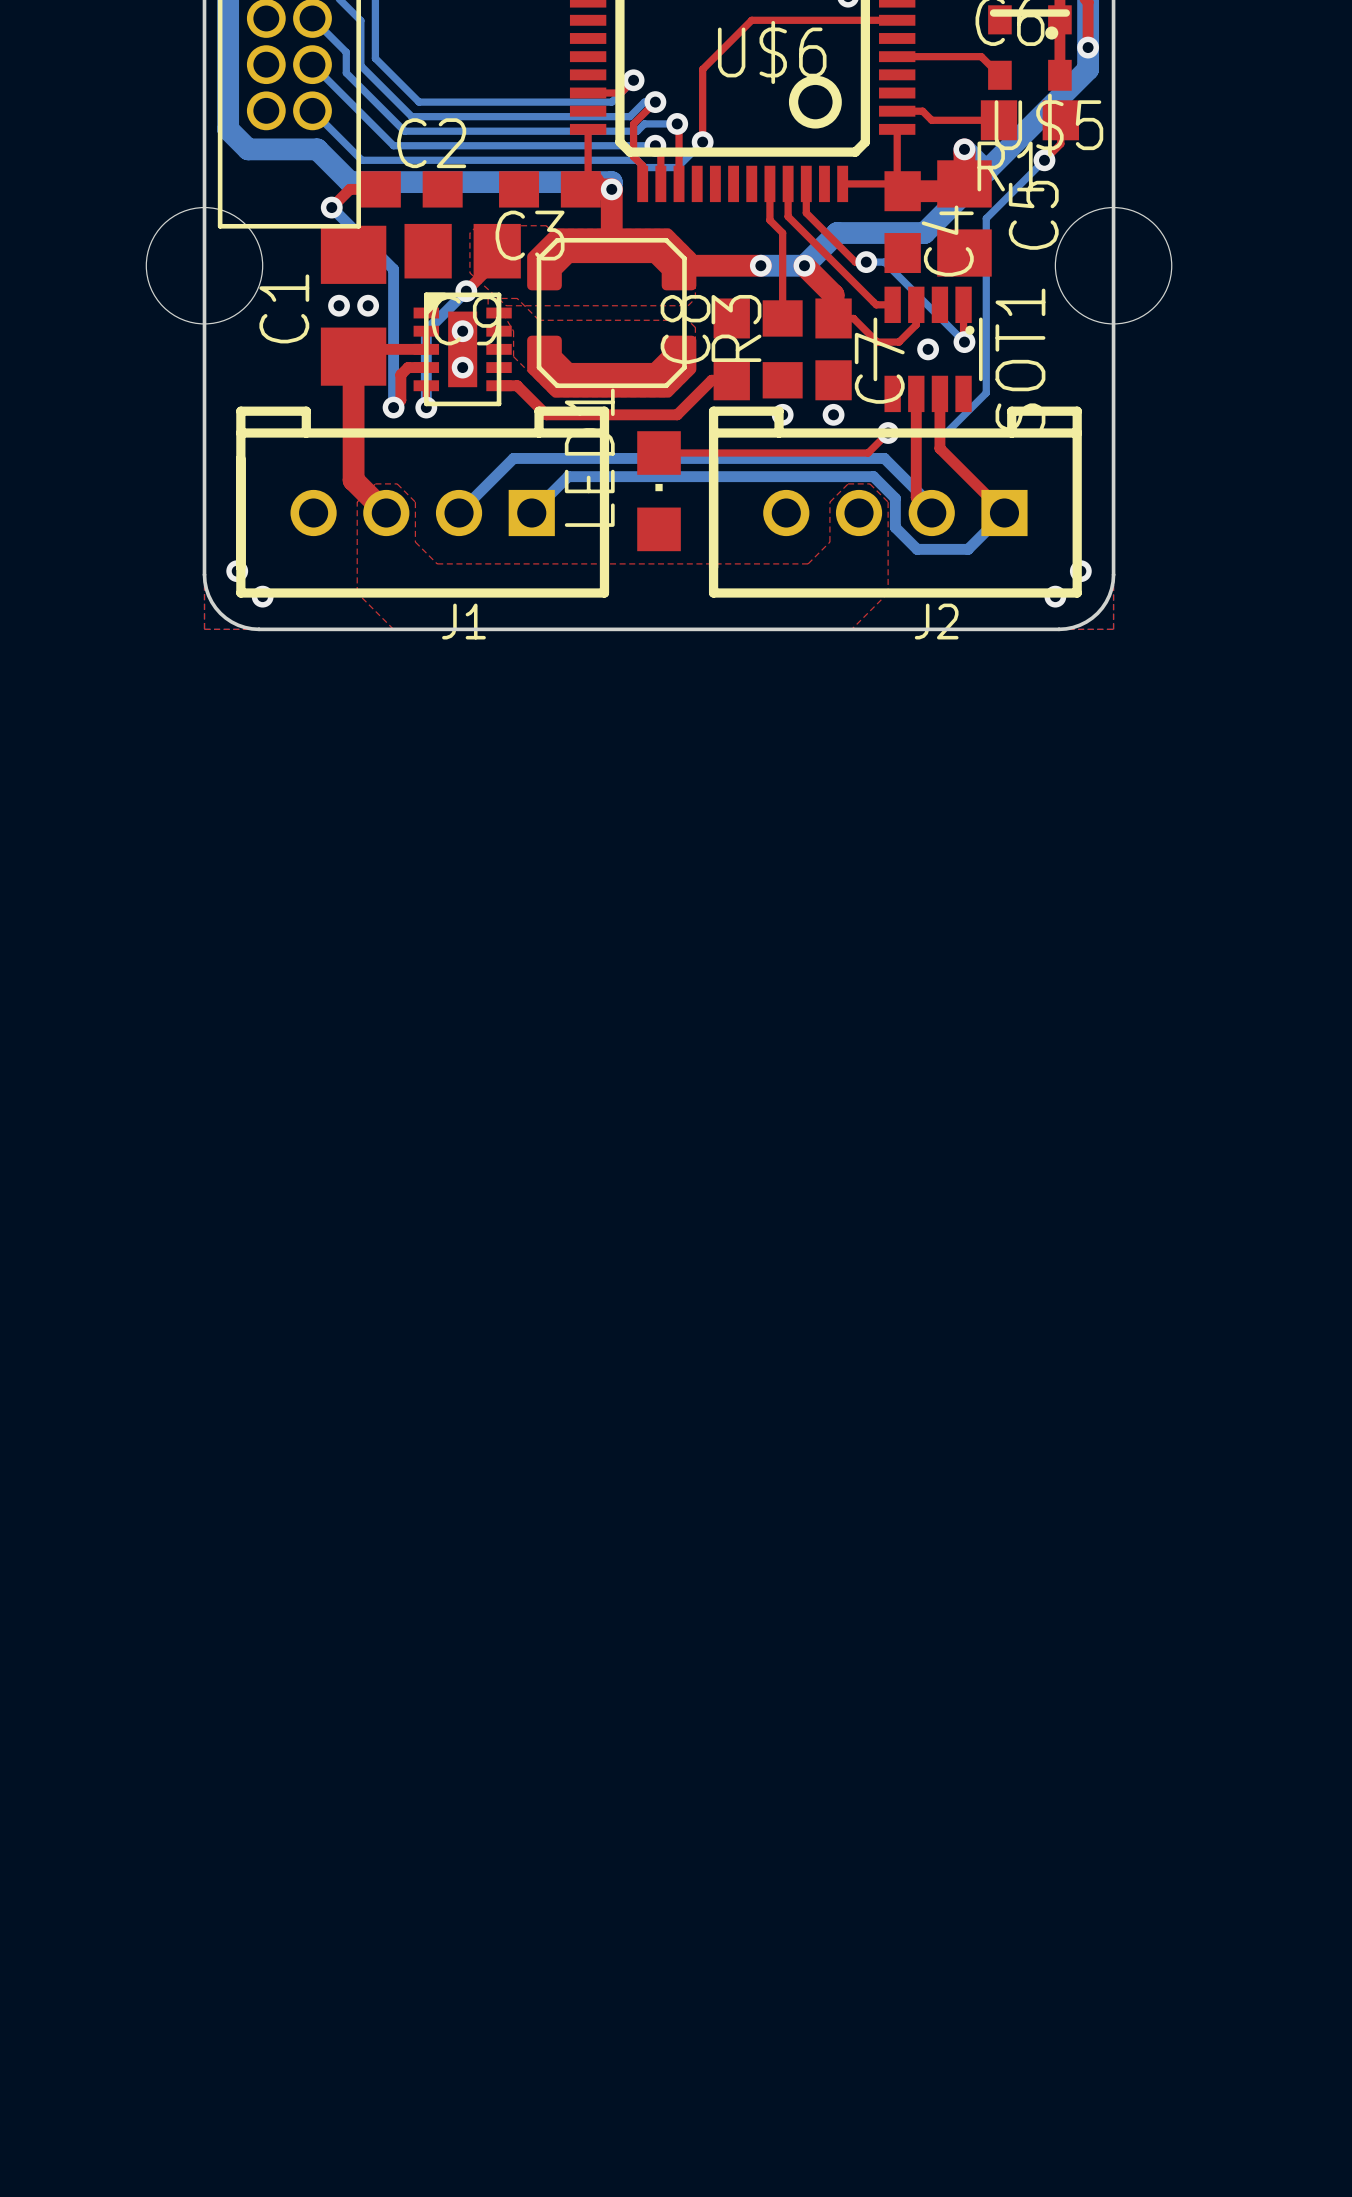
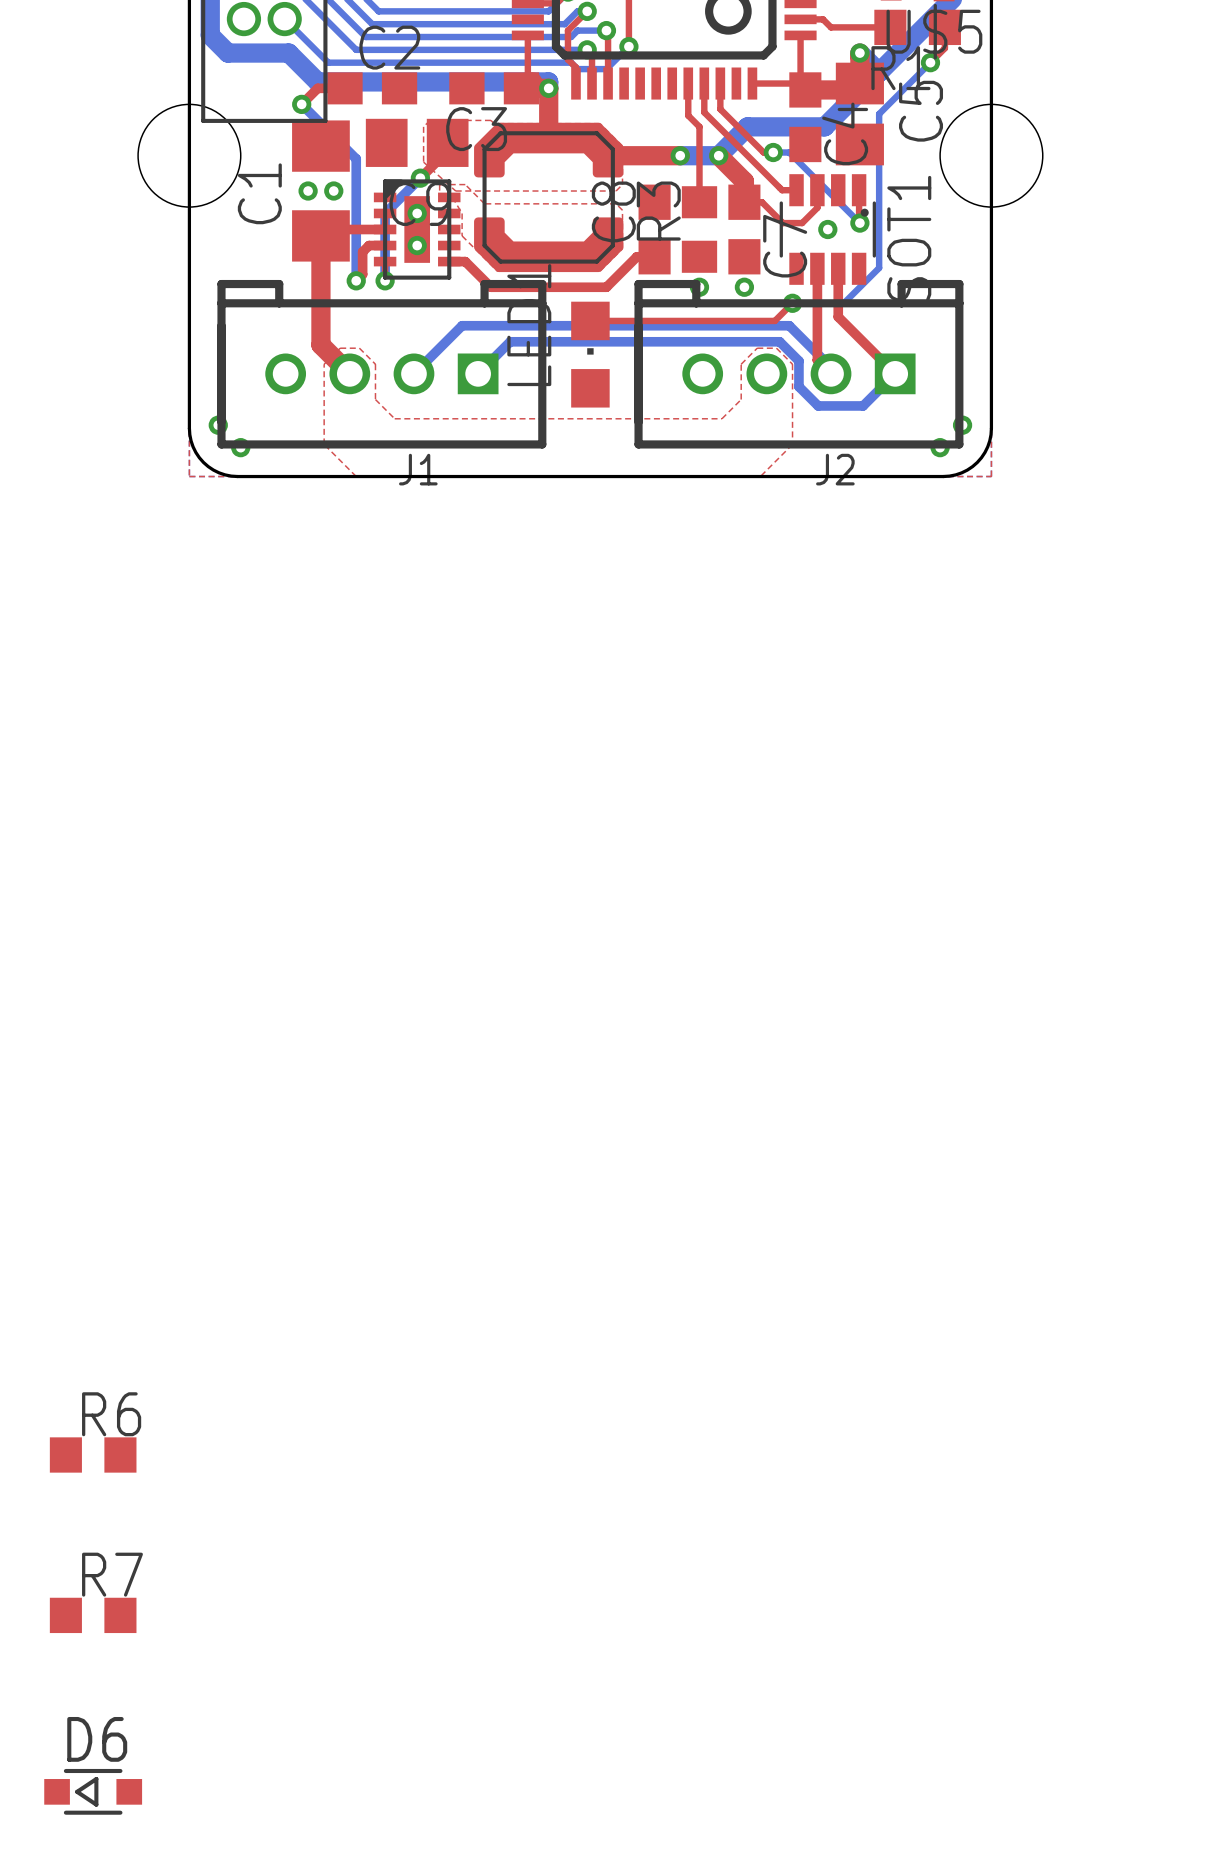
R6: none -> (93, 1454)
R7: none -> (93, 1615)
D6: none -> (93, 1791)

